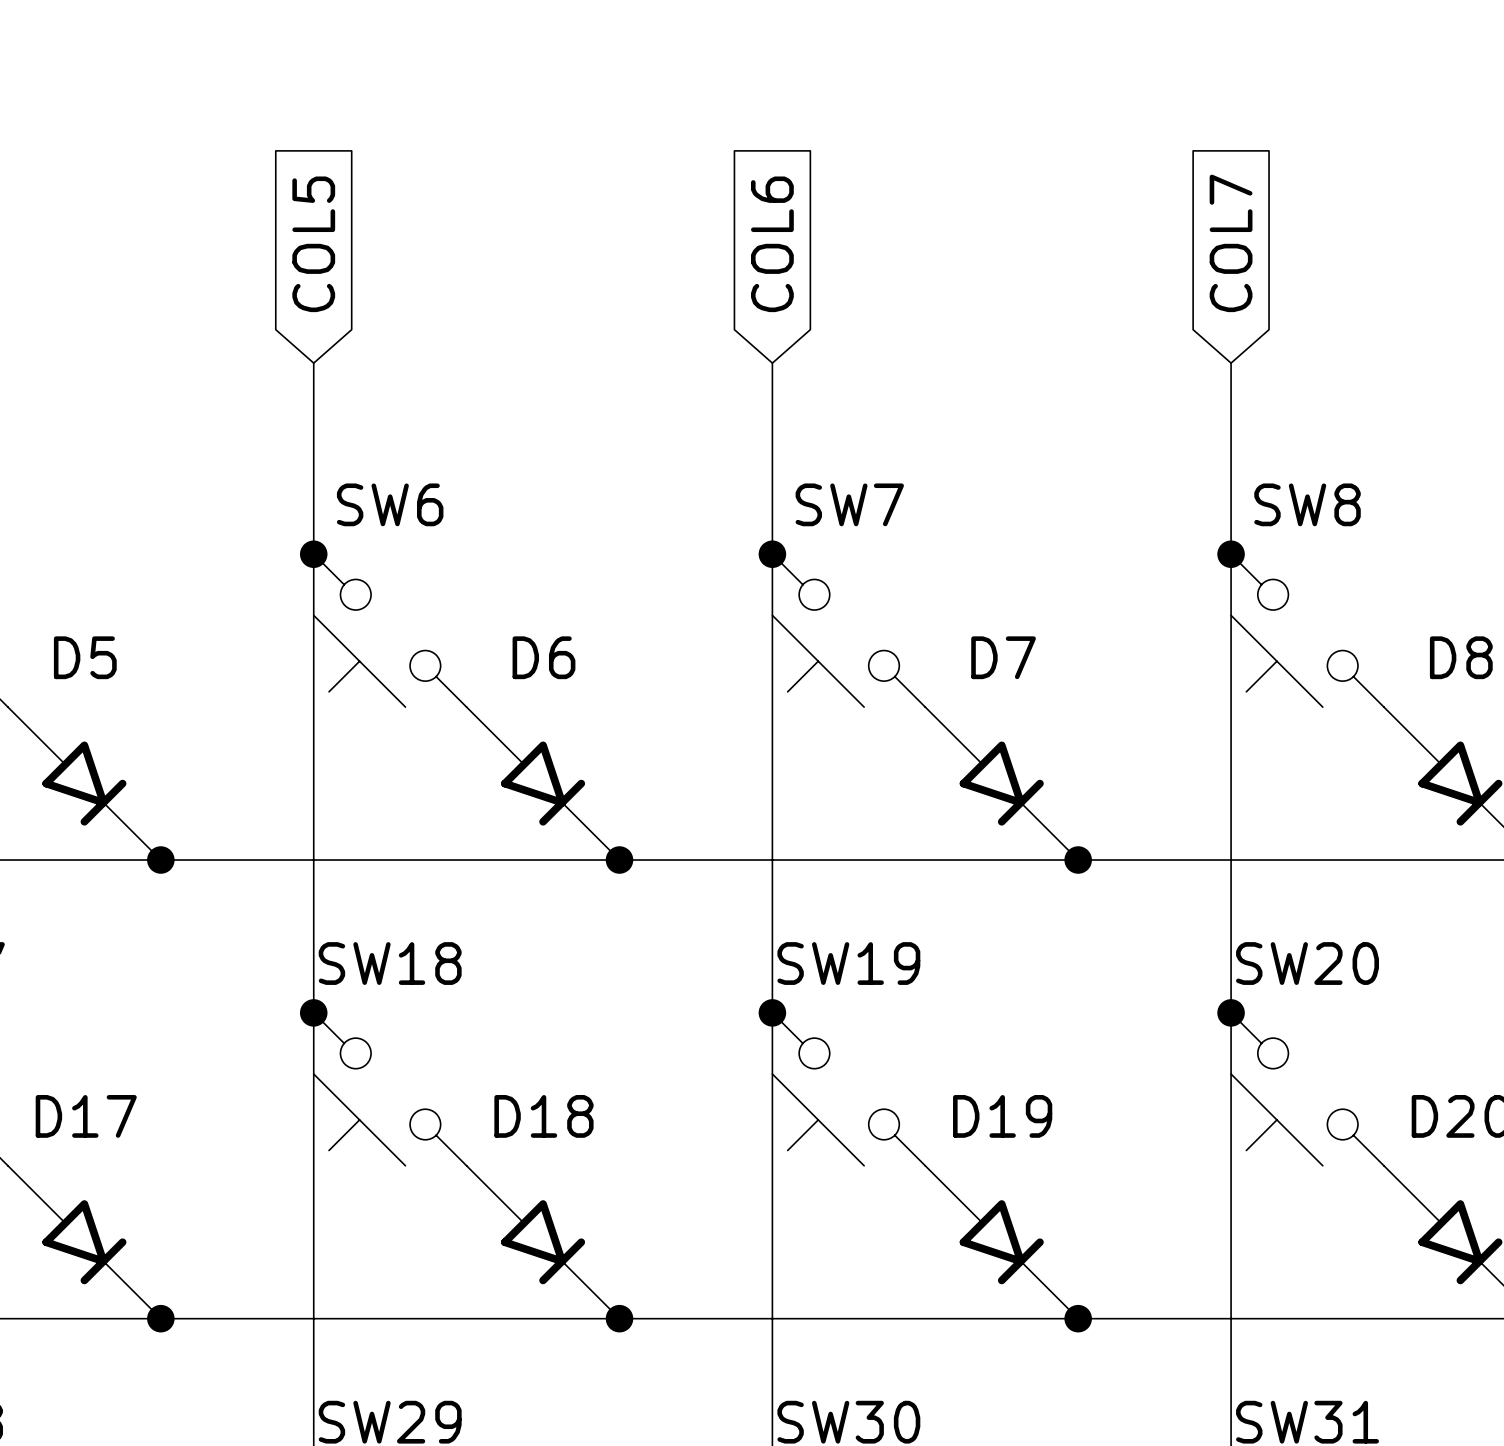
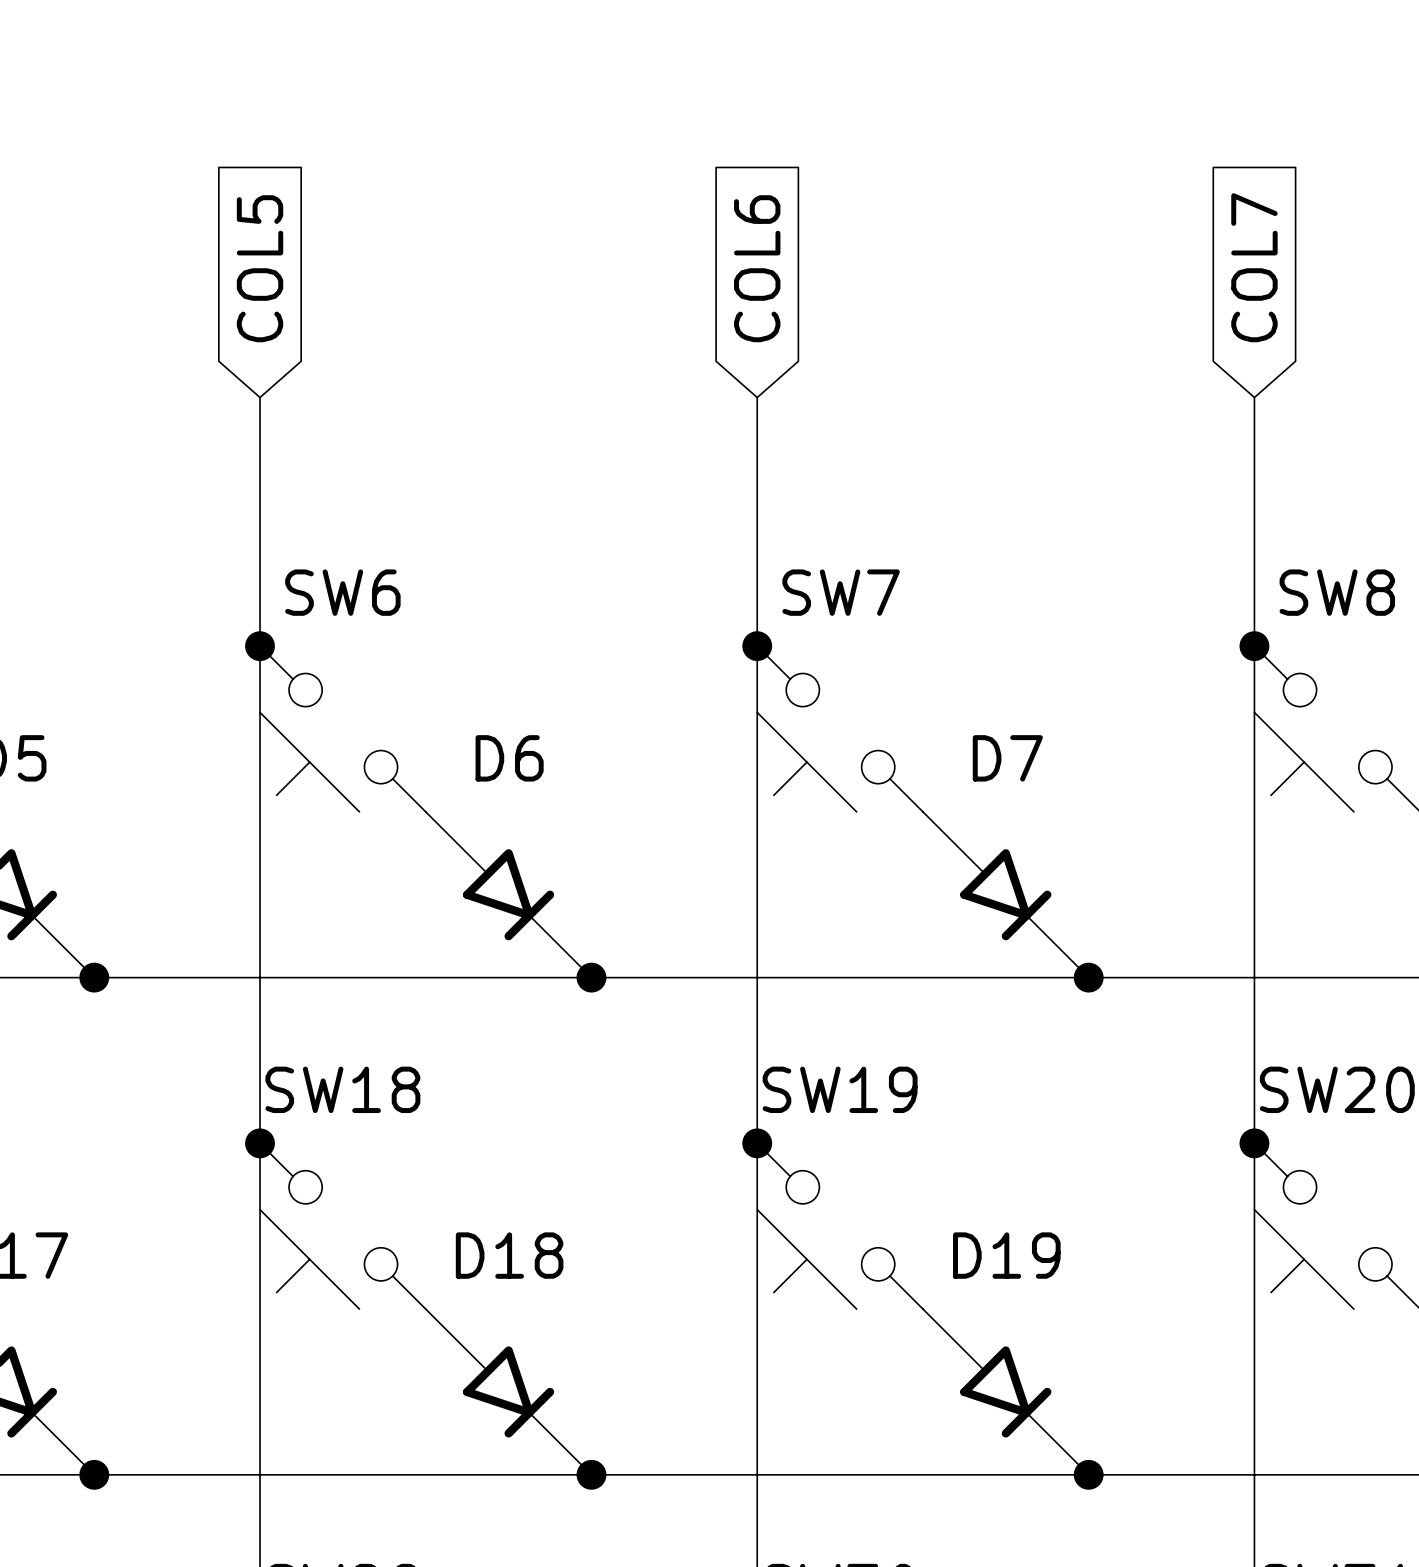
global label position: COL7 (1231, 243) -> COL7 (1254, 267)
global label position: COL5 (313, 244) -> COL5 (260, 268)
global label position: COL6 (772, 244) -> COL6 (757, 268)
wire: none -> (260, 397) (260, 438)
wire: none -> (757, 397) (757, 438)
wire: none -> (1254, 397) (1254, 438)

